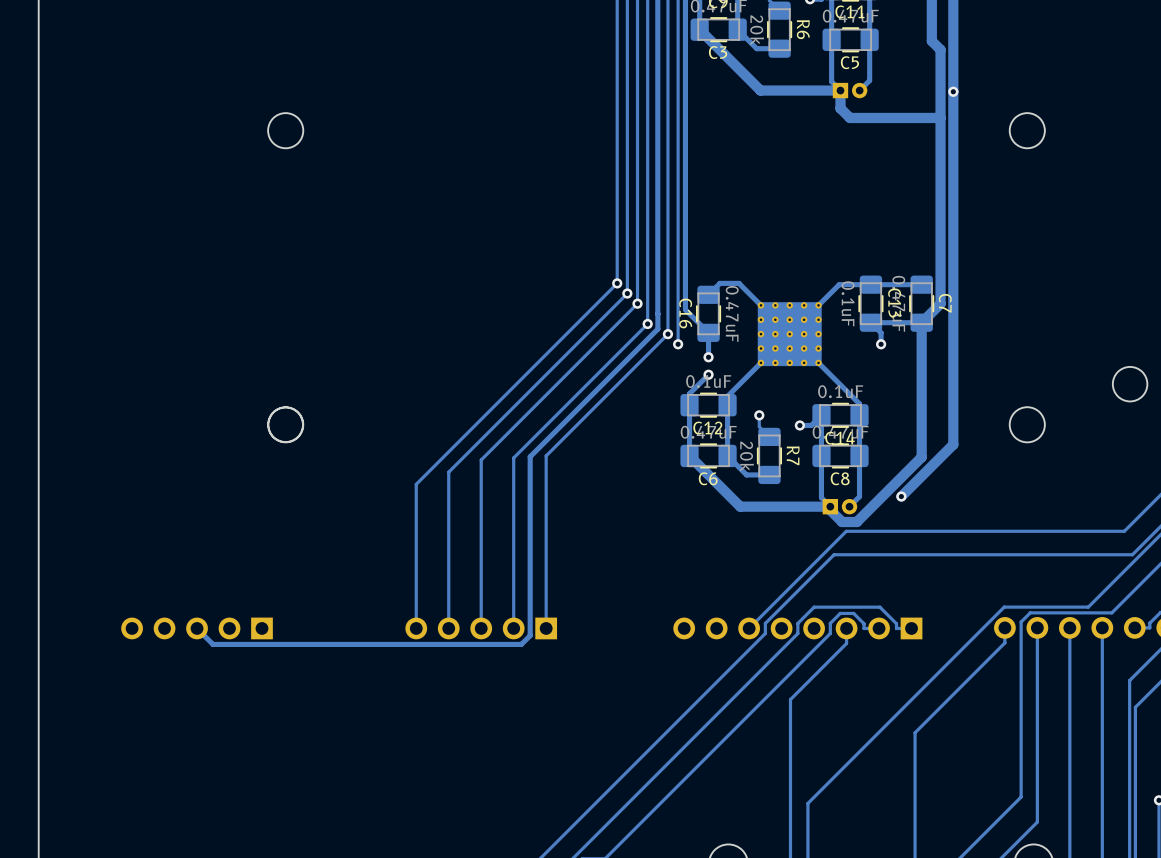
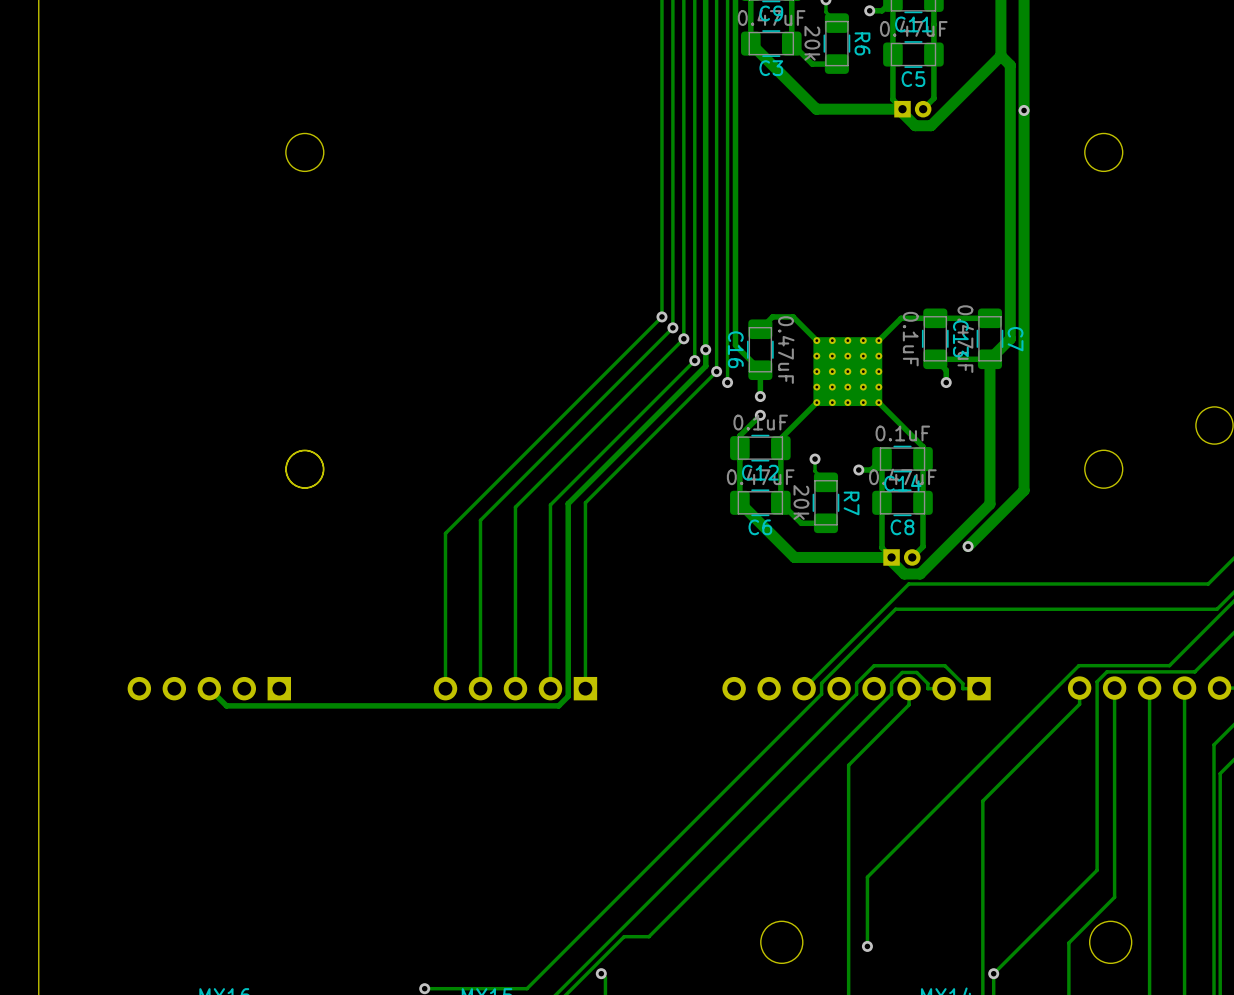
track: (840, 94) (840, 108) (850, 117) (940, 117) -> (902, 112) (915, 125) (931, 125) (1000, 55)
via: none -> (705, 349)

